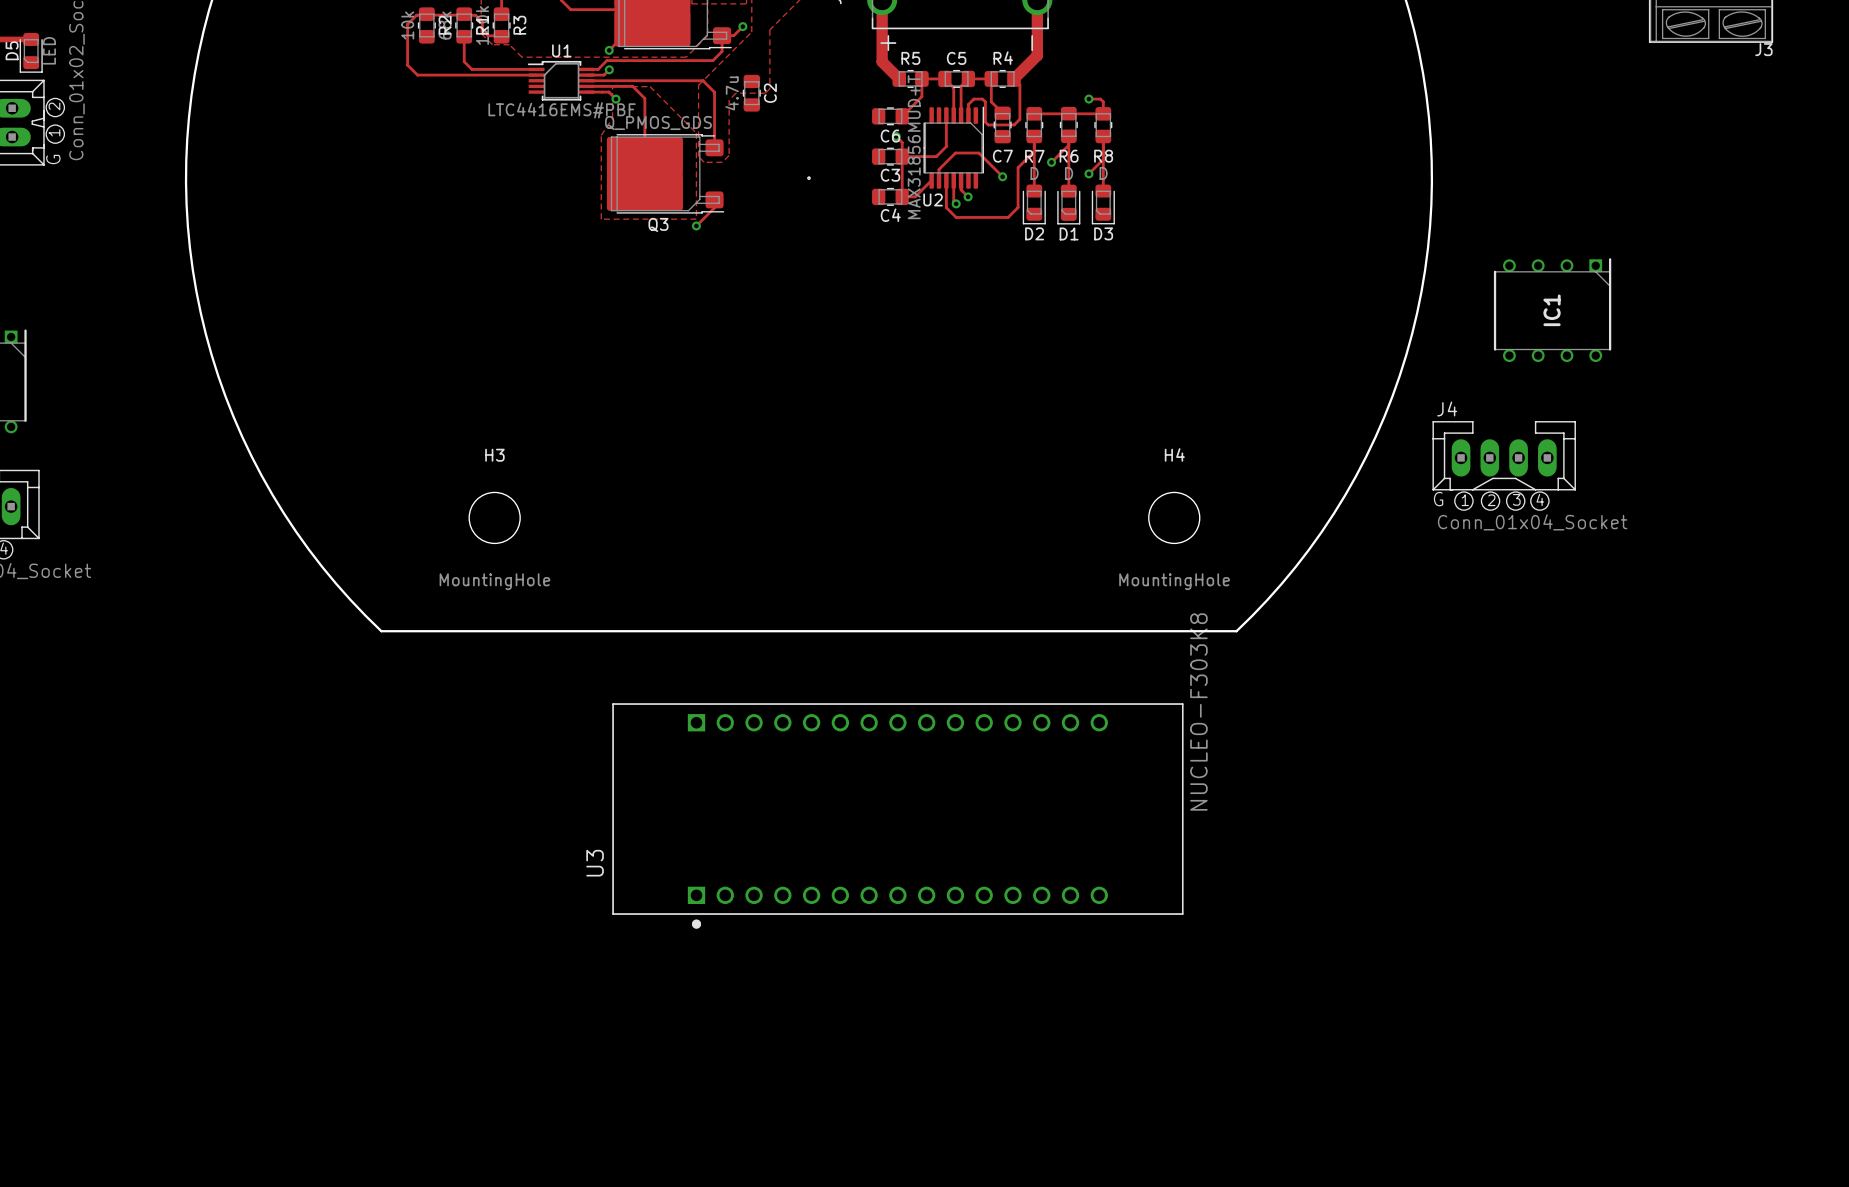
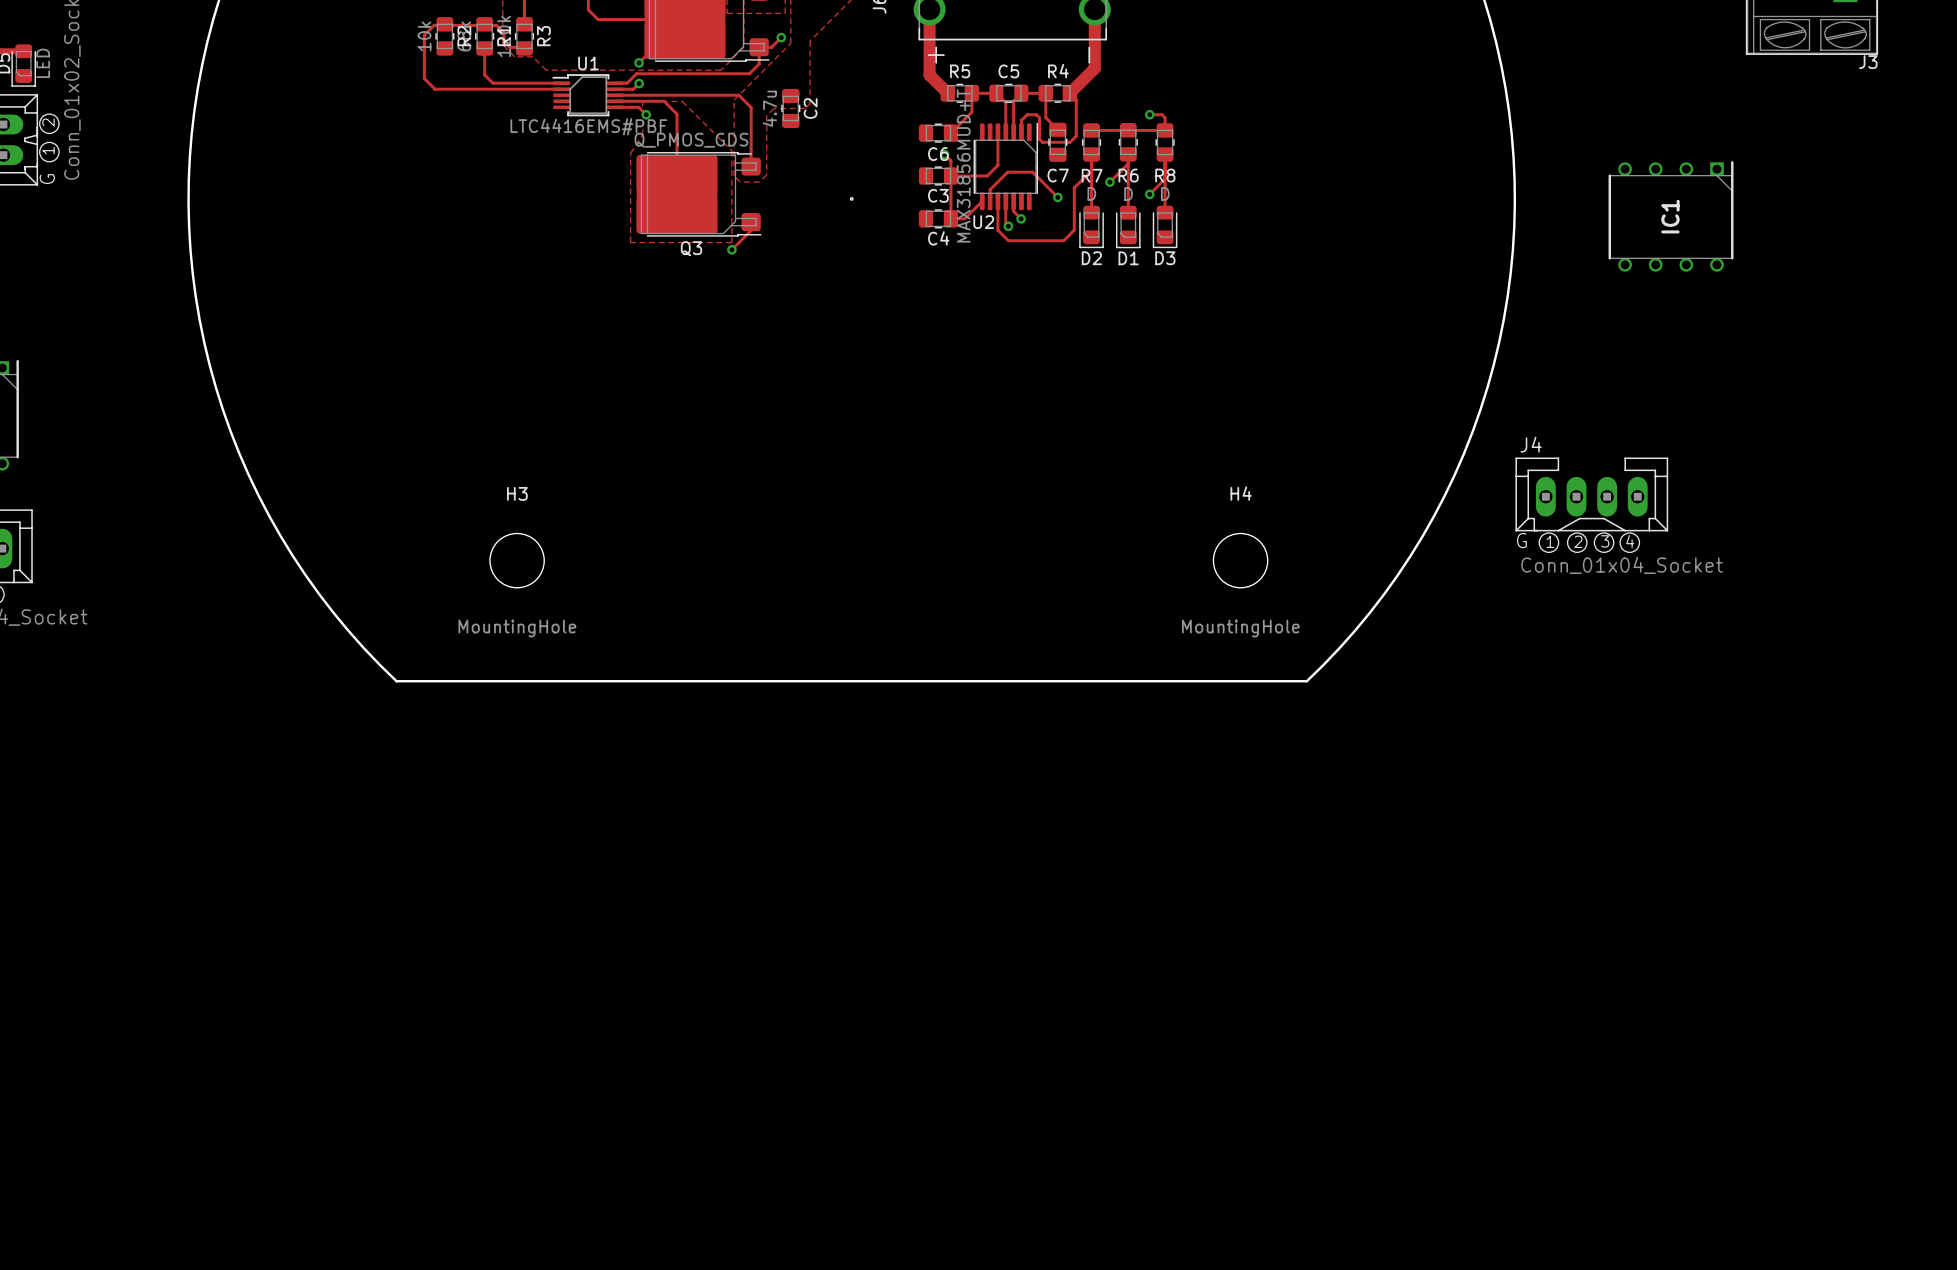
IC1 position: (1552, 310) -> (1671, 216)
U3: NUCLEO-F303K8 (897, 815) -> none

